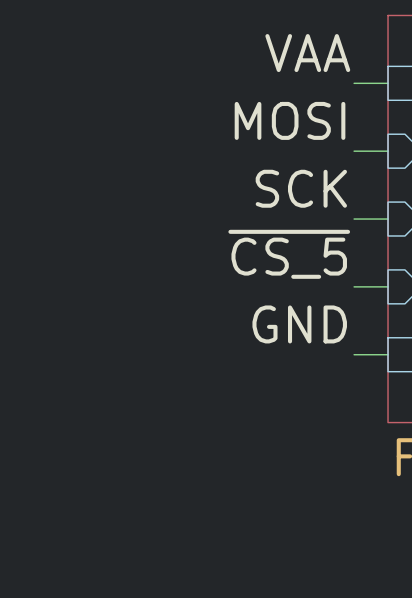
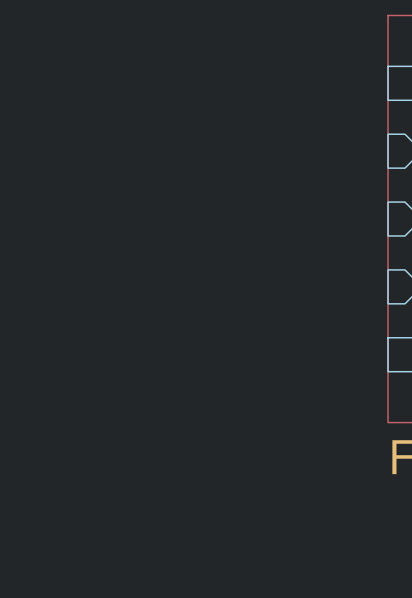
label: VAA (307, 53) -> none
wire: (354, 83) (388, 83) -> none
label: MOSI (290, 120) -> none
wire: (354, 151) (388, 151) -> none
label: SCK (301, 188) -> none
wire: (354, 219) (388, 219) -> none
label: ~{CS_5} (289, 254) -> none
wire: (354, 286) (388, 286) -> none
label: GND (299, 324) -> none
wire: (354, 354) (388, 354) -> none

